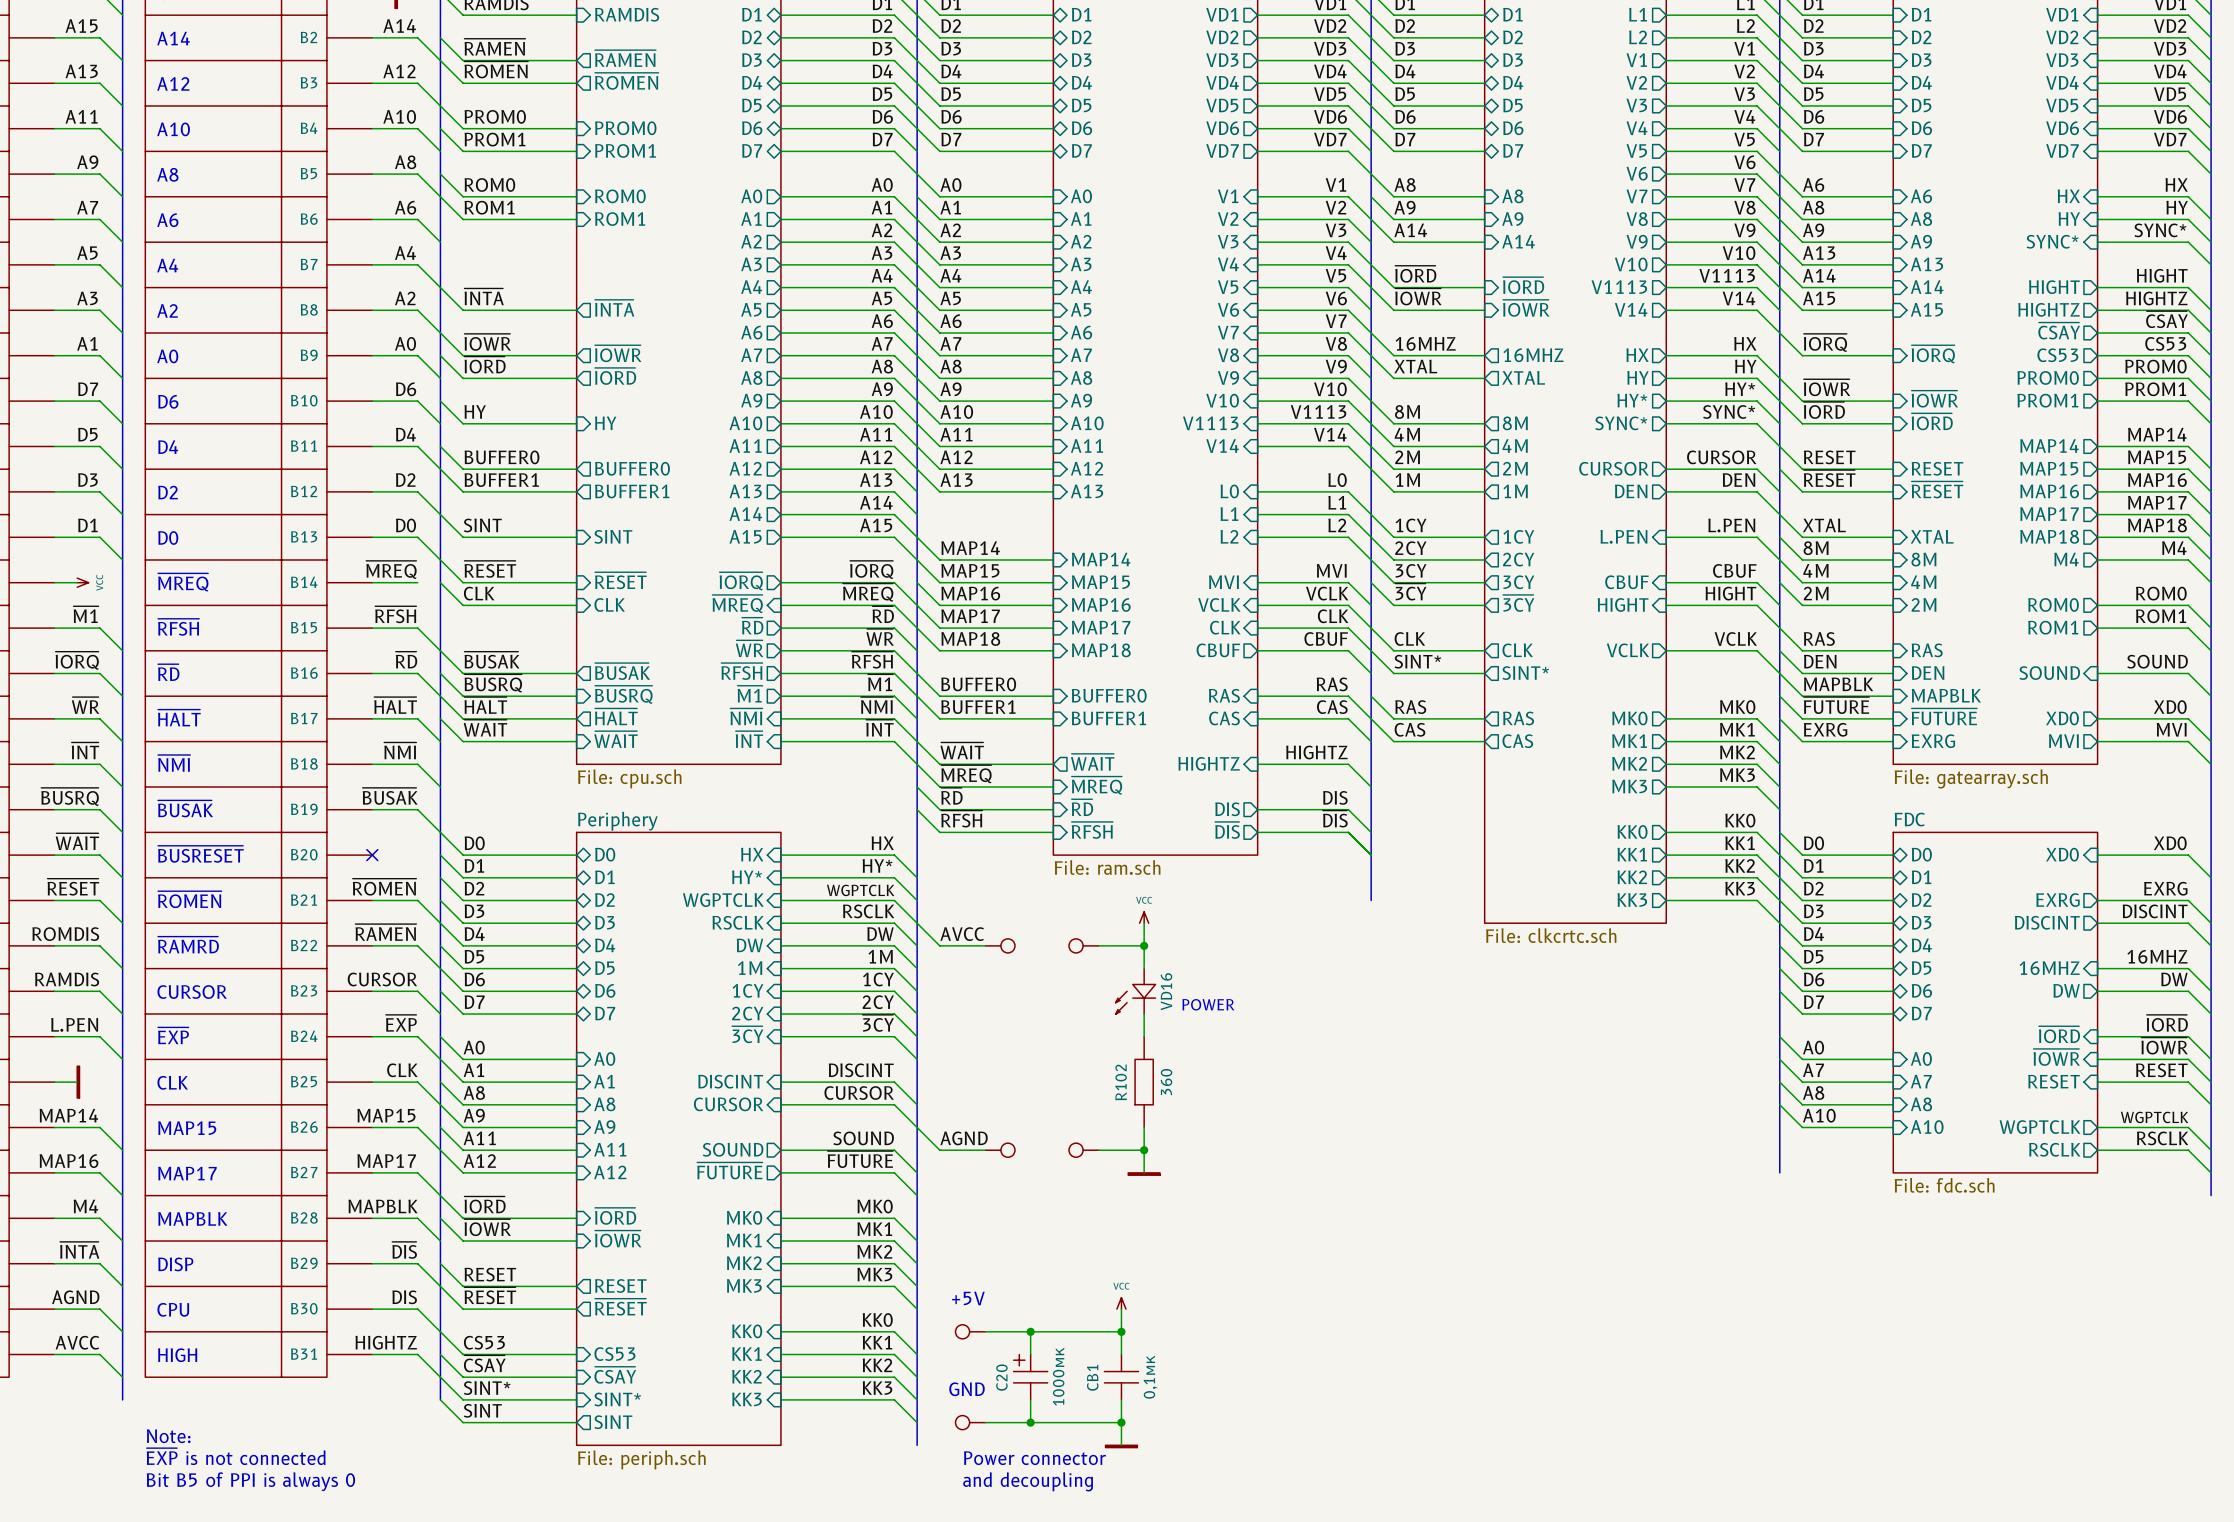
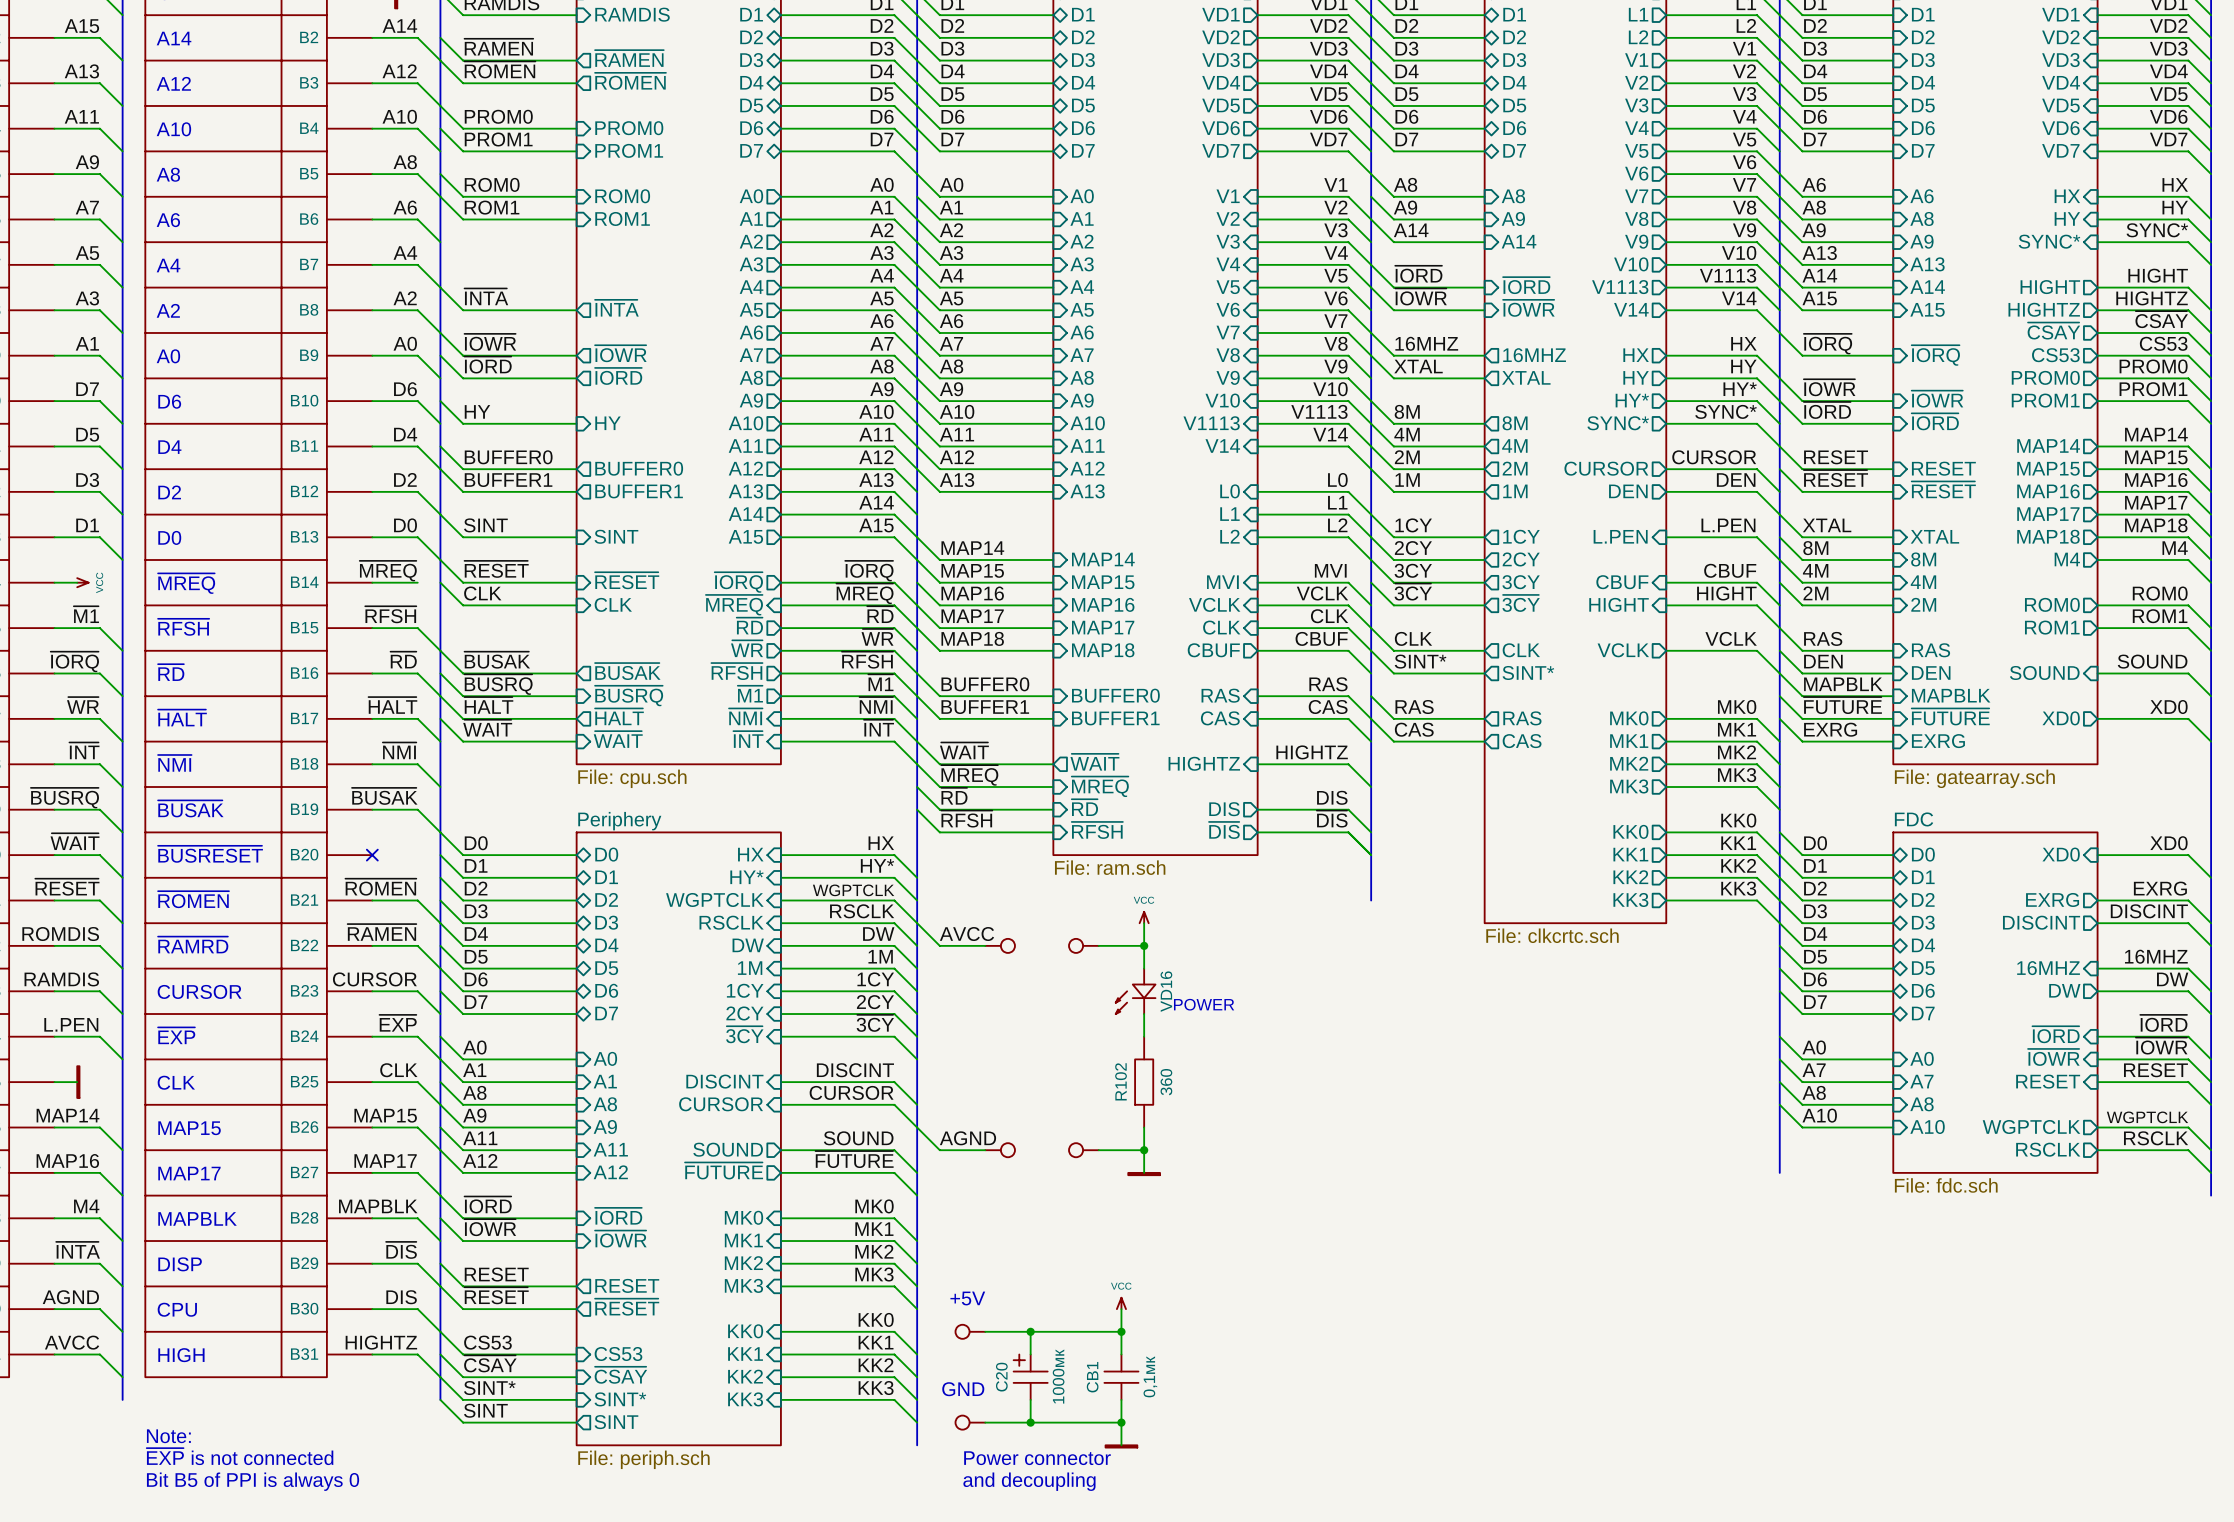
label: MVI (2171, 729) -> none
sheet pin: MVI (2063, 741) -> none
wire: (2097, 741) (2188, 741) (2211, 764) -> none

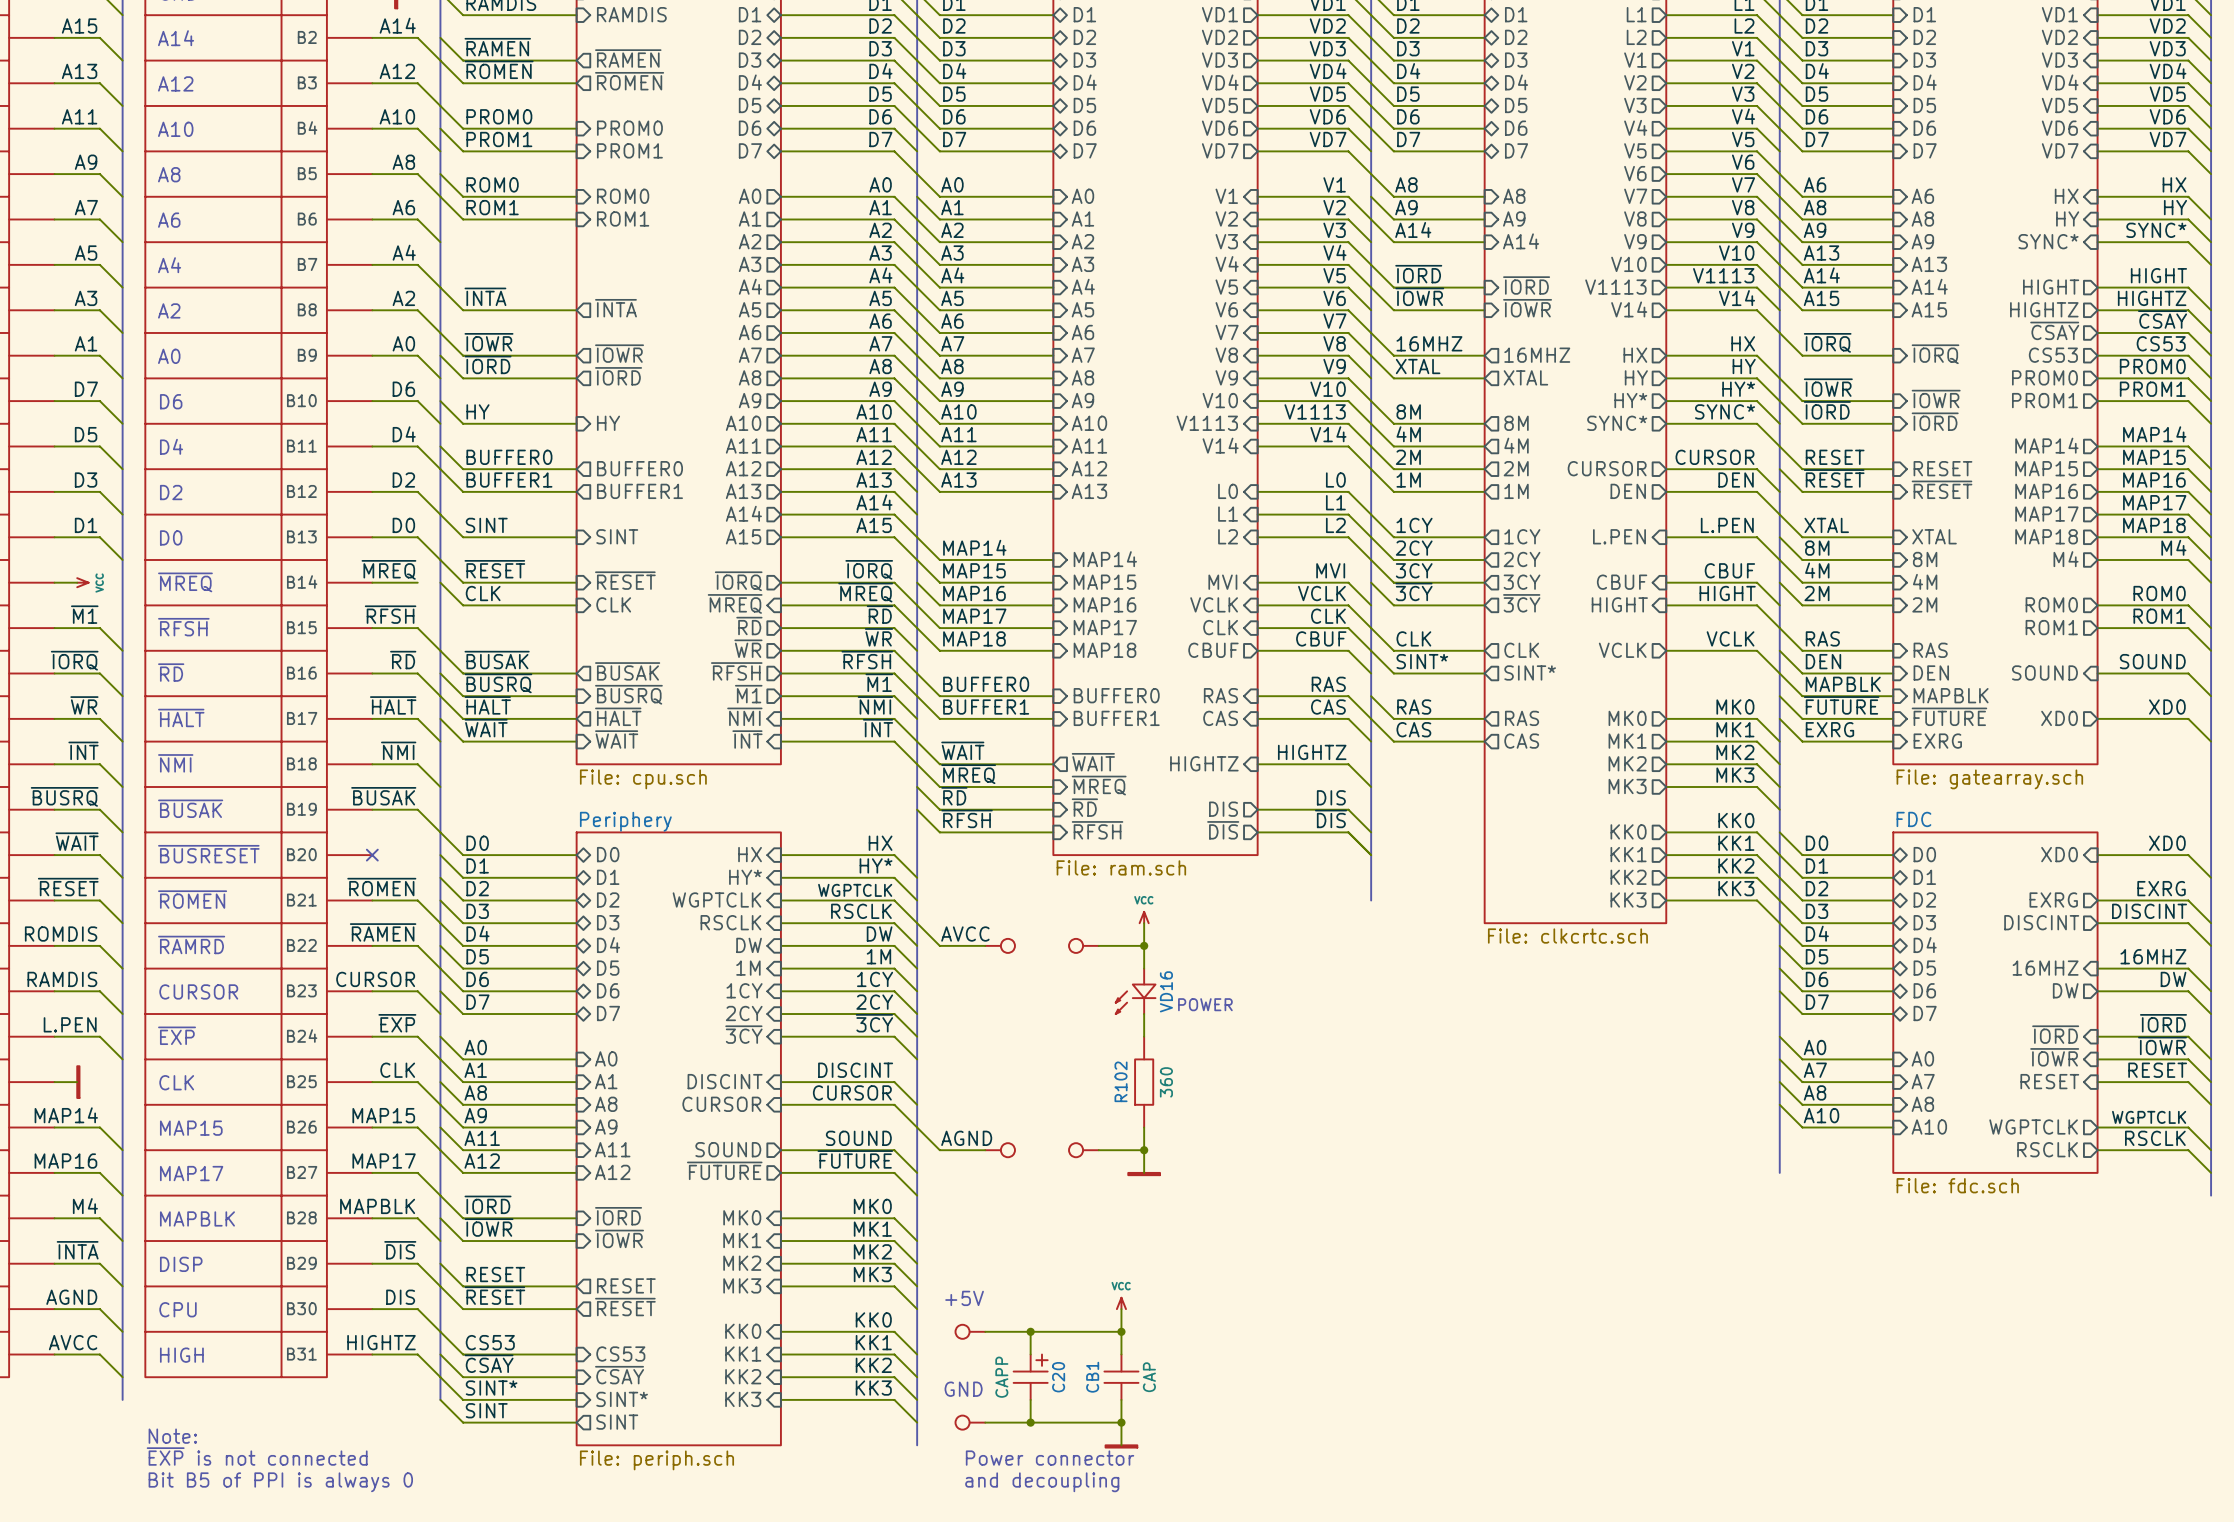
C20 flip: as is (1030, 1368) -> left-right (1030, 1368)
C20 value: 1000мк (1058, 1376) -> CAPP (1001, 1377)
CB1 value: 0,1мк (1150, 1376) -> CAP (1149, 1377)

